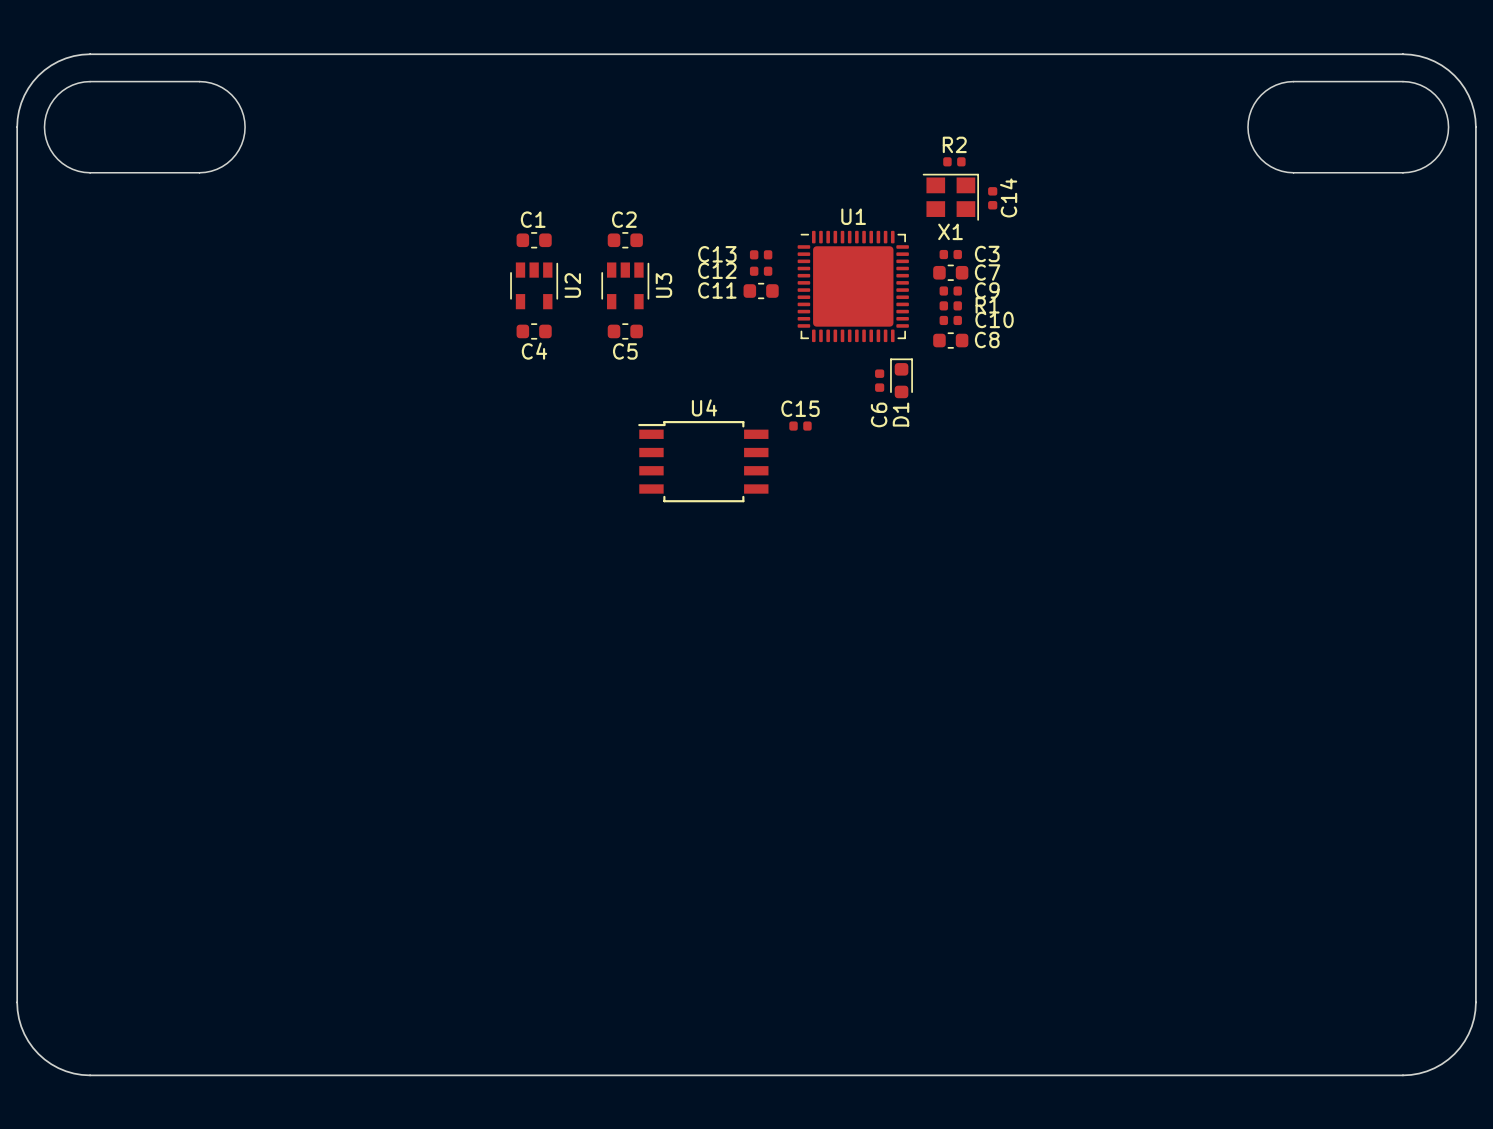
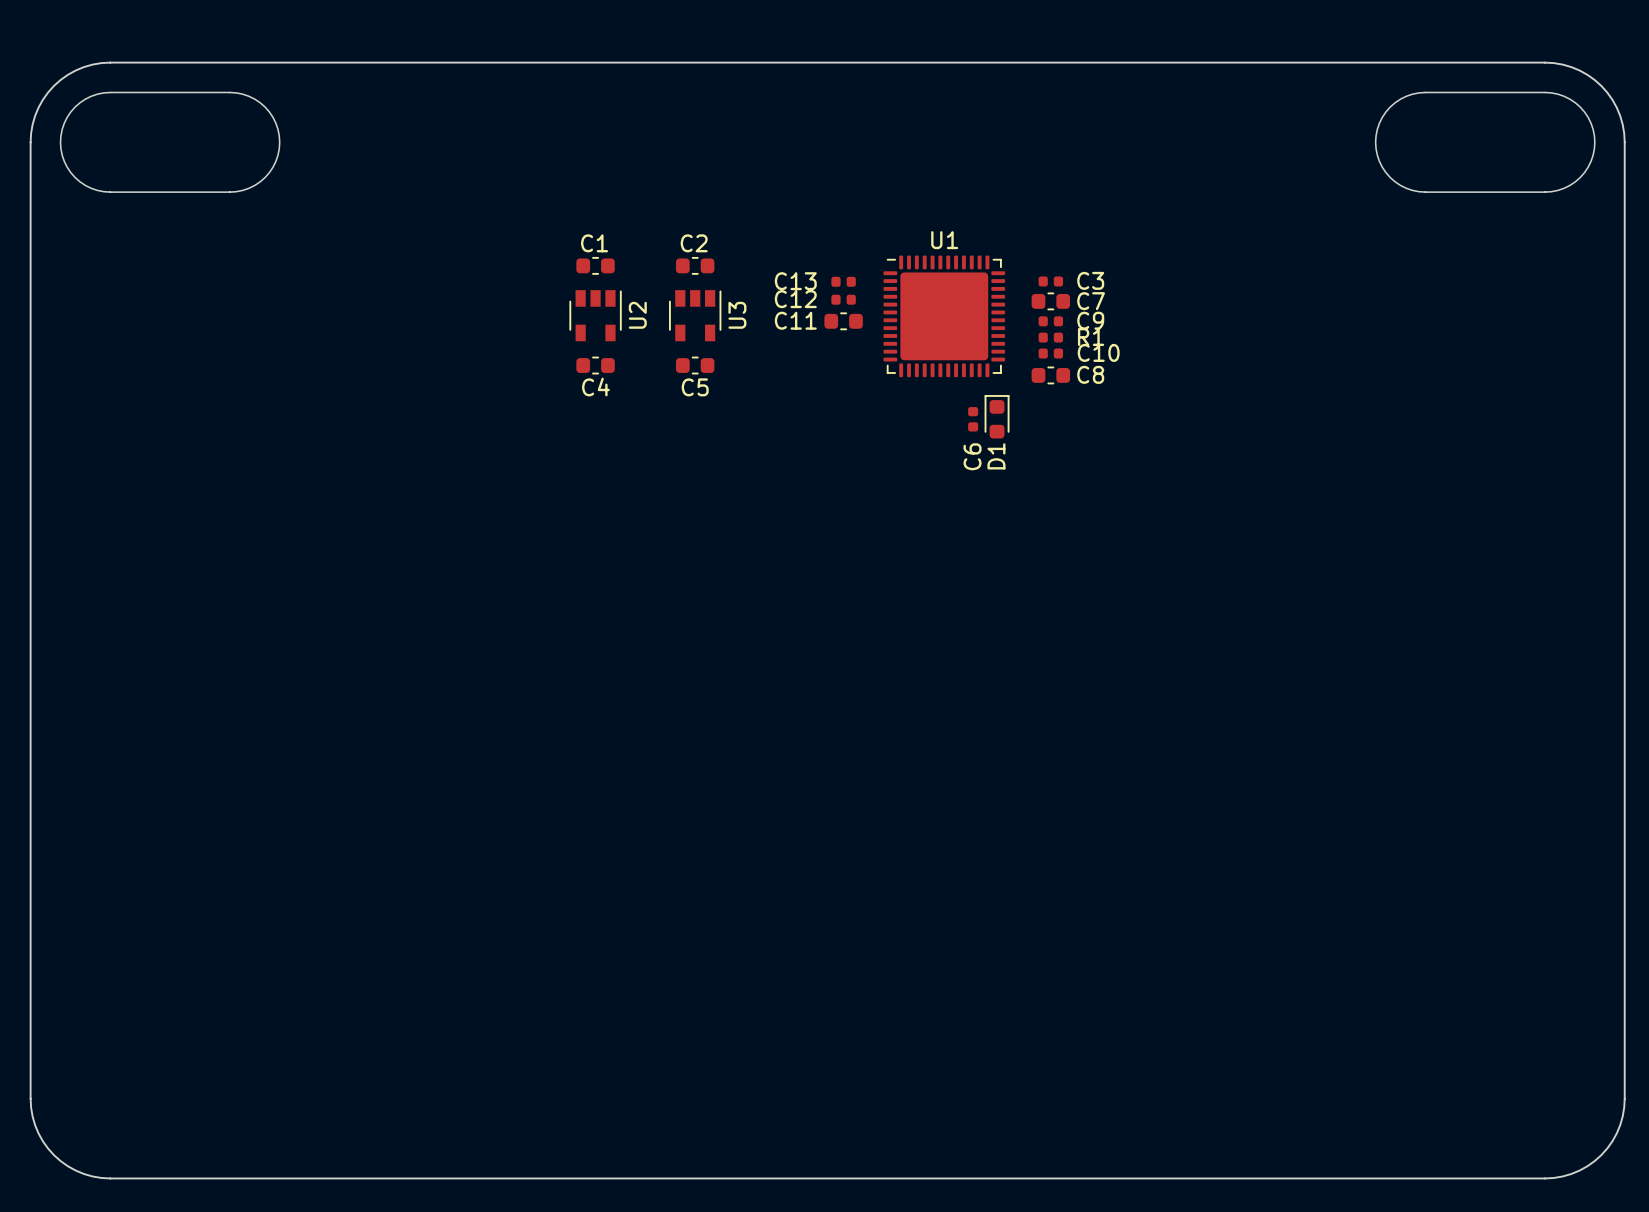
R2: (954, 161) -> none
X1: (950, 197) -> none
C14: (992, 198) -> none
C15: (800, 426) -> none
U4: (703, 461) -> none

